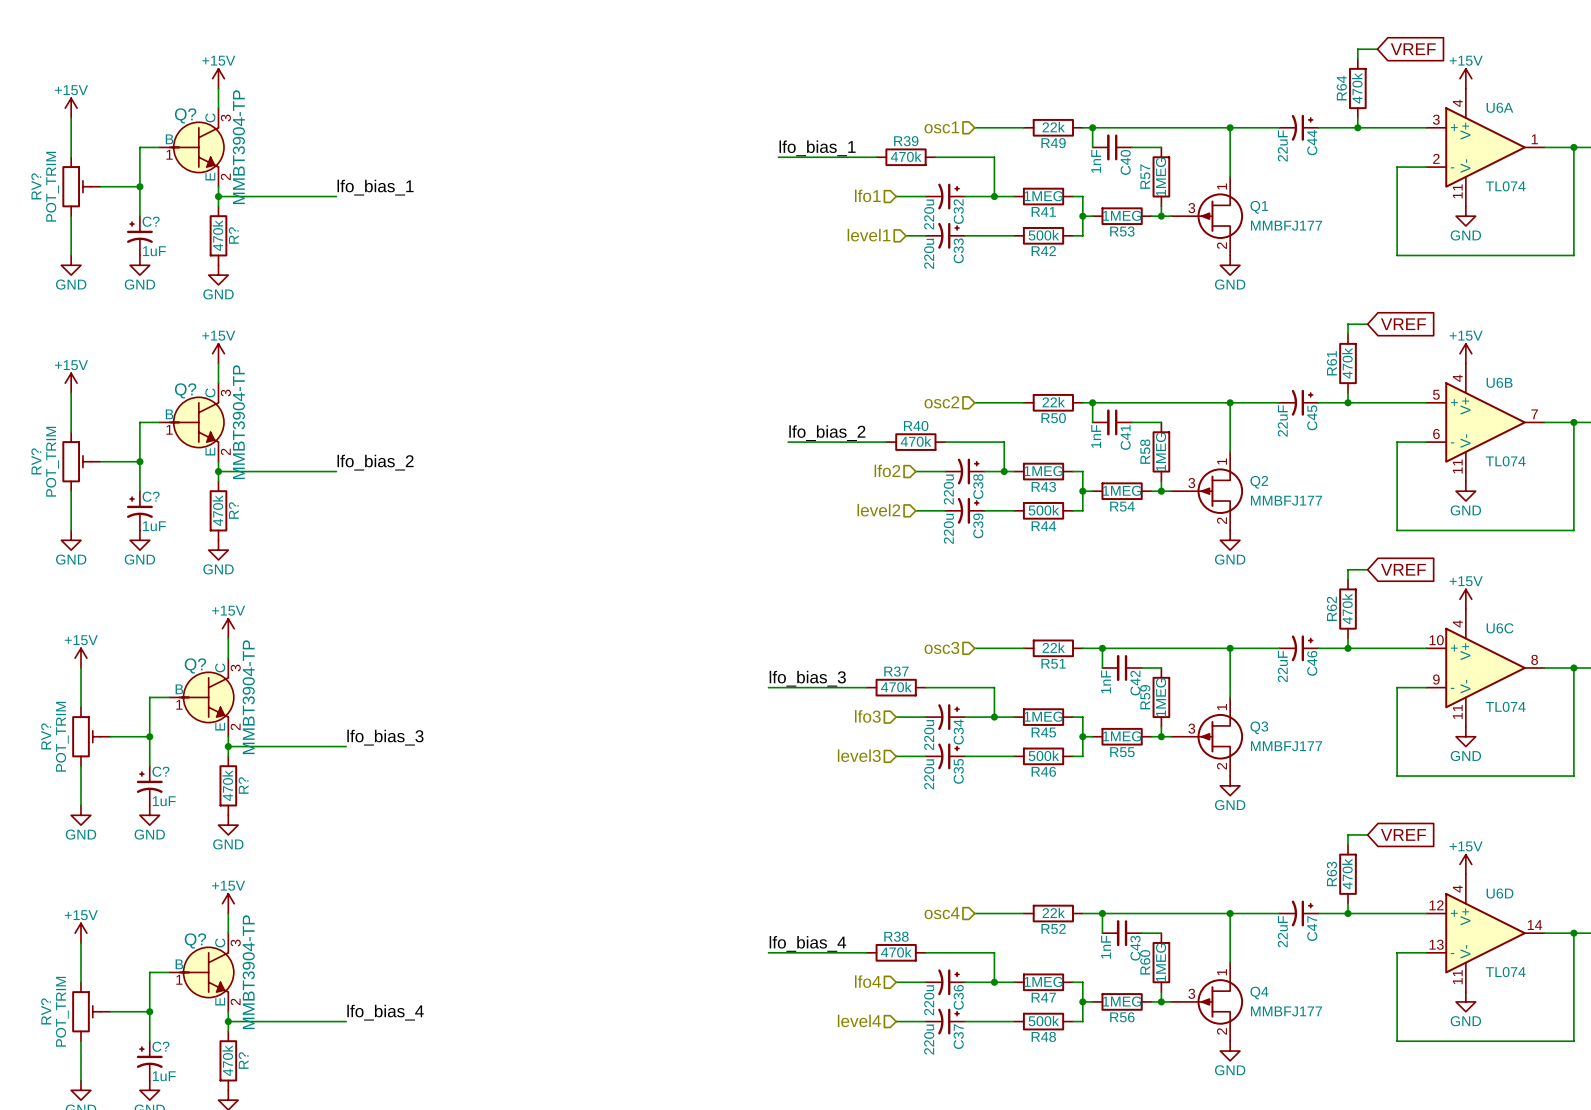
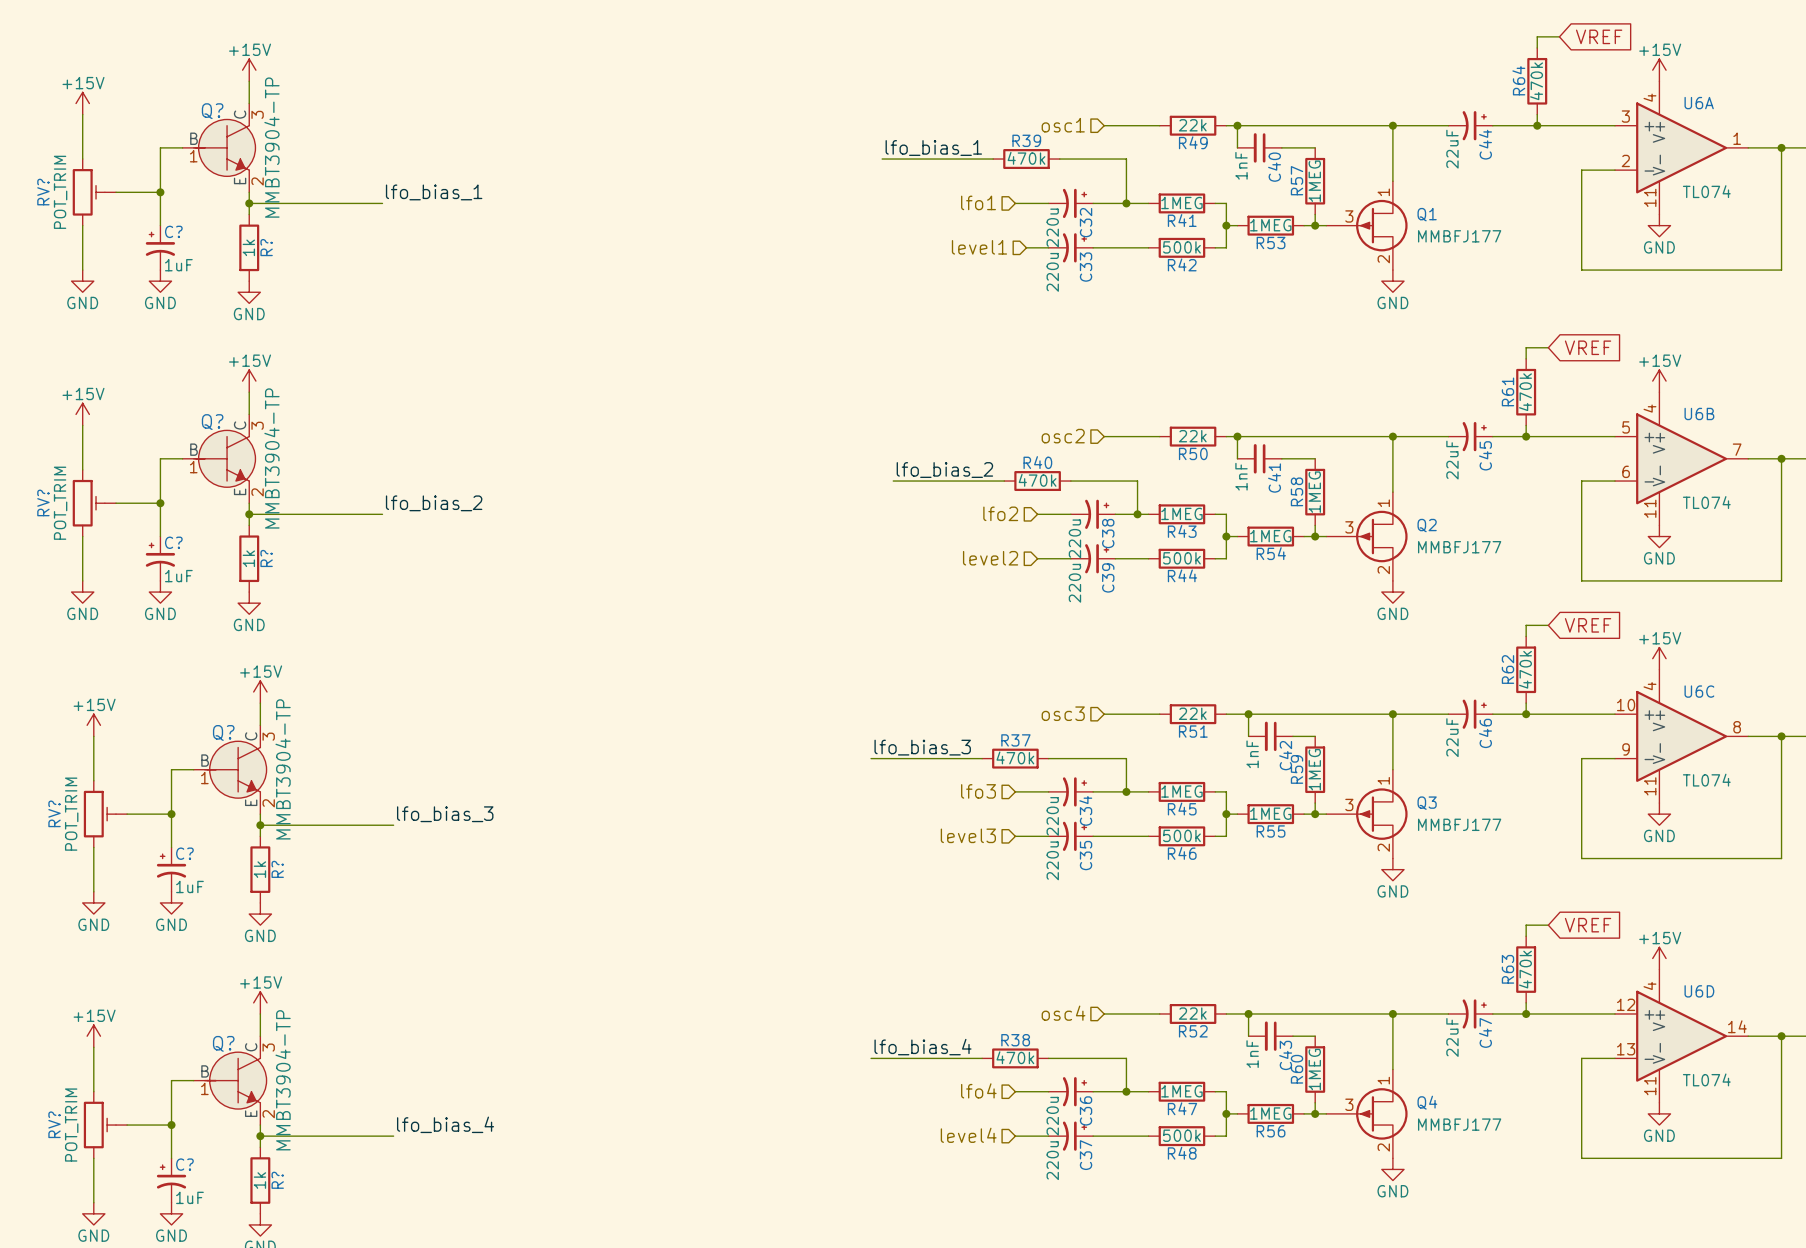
R? value: 470k (217, 235) -> 1k (248, 247)
R? value: 470k (217, 510) -> 1k (248, 558)
R? value: 470k (227, 785) -> 1k (259, 869)
R? value: 470k (227, 1060) -> 1k (259, 1180)

